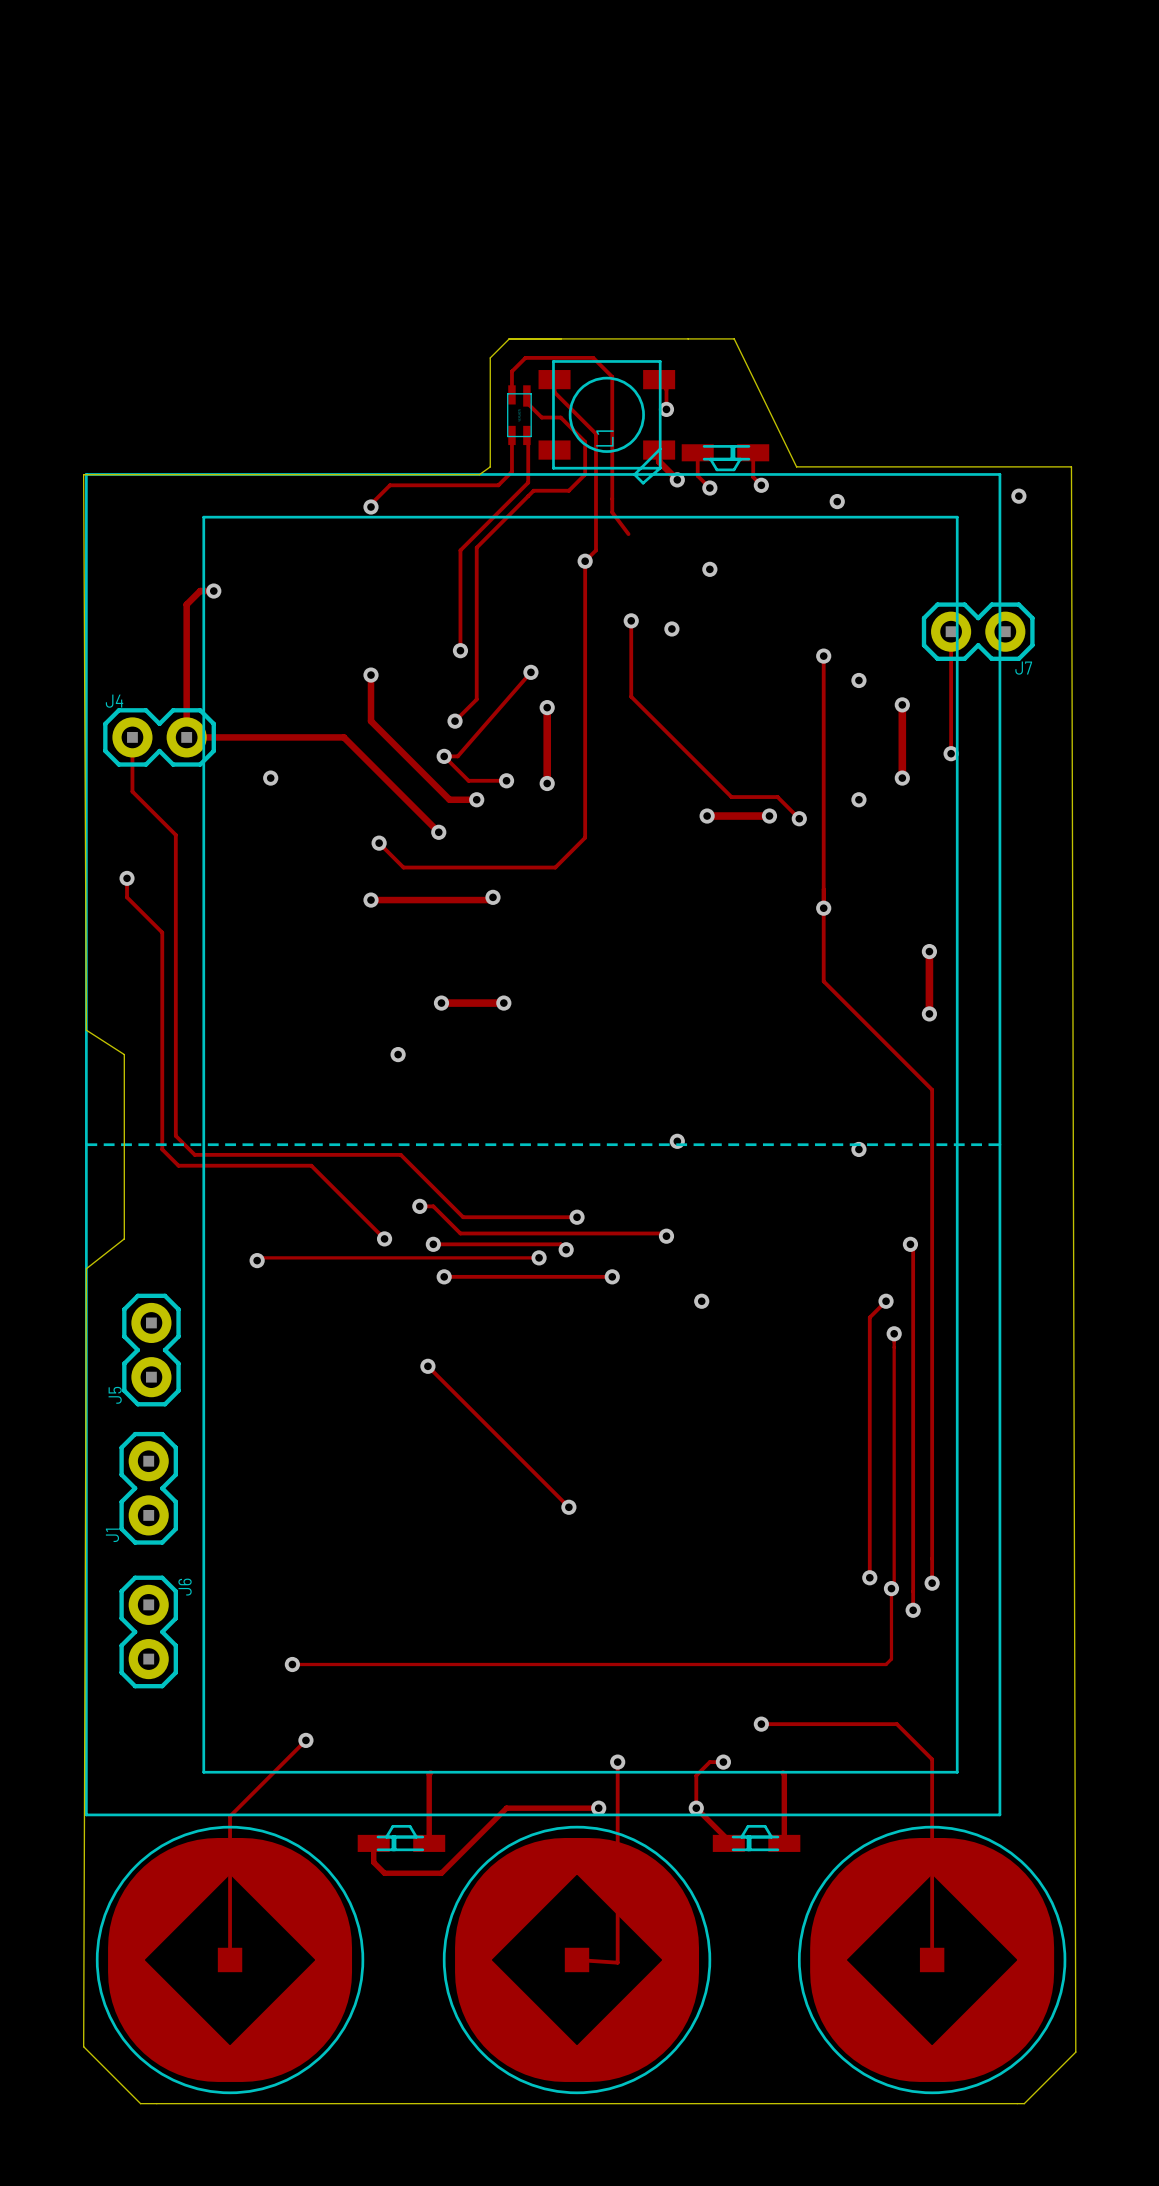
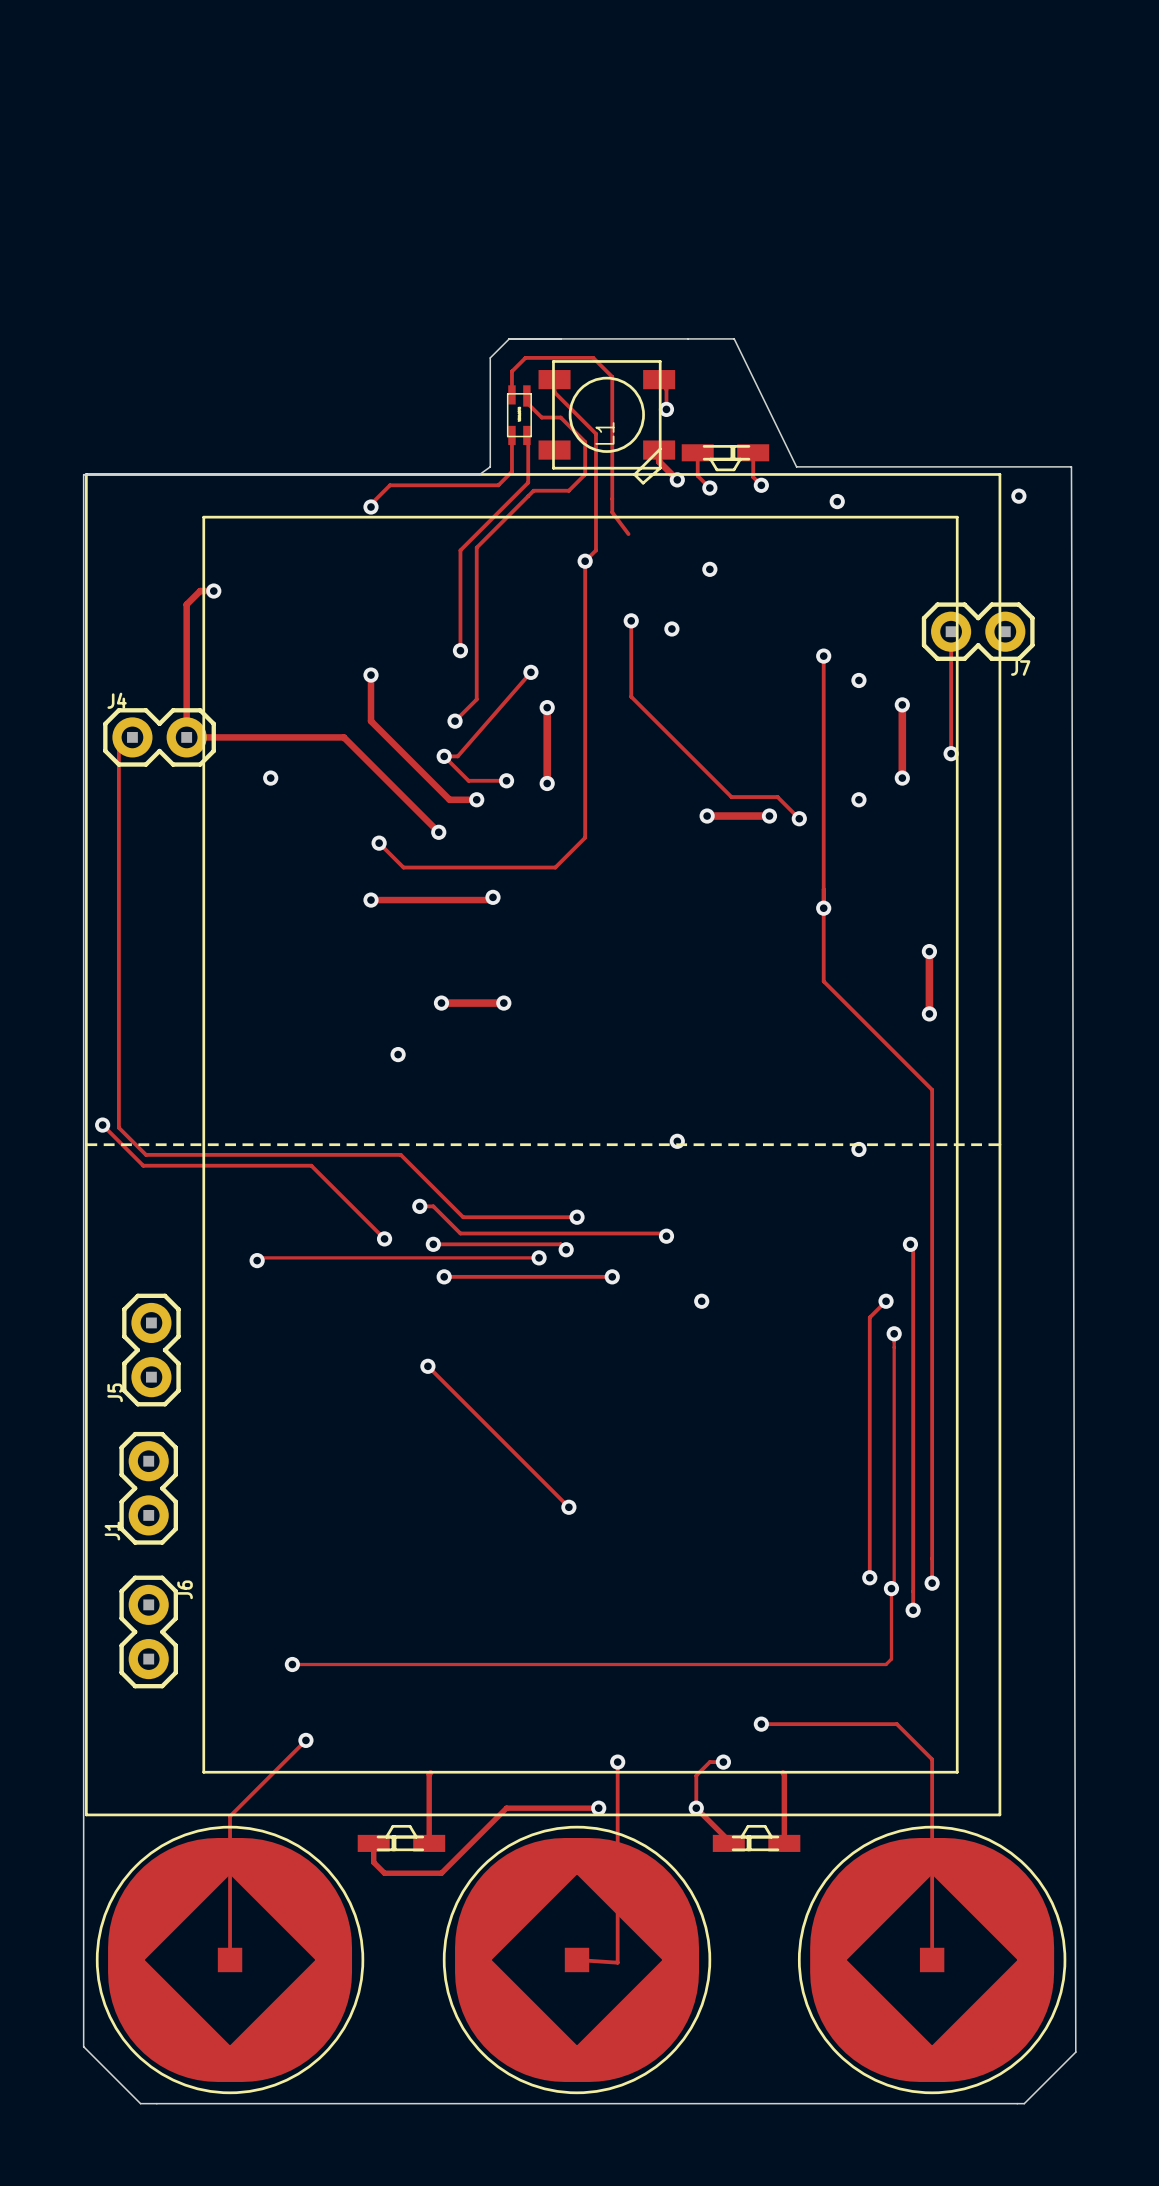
board edge: (83, 474) (86, 1030) (124, 1054) (124, 1238) (86, 1268) (83, 2046) -> (83, 474) (83, 2046)
track: (132, 737) (132, 791) (175, 835) (175, 1135) (194, 1154) -> (132, 737) (118, 750) (118, 1127) (146, 1154) (194, 1154)
track: (127, 878) (127, 897) (162, 932) (162, 1149) (178, 1165) -> (102, 1125) (143, 1165) (178, 1165)
via: (127, 878) -> none
via: none -> (102, 1125)

